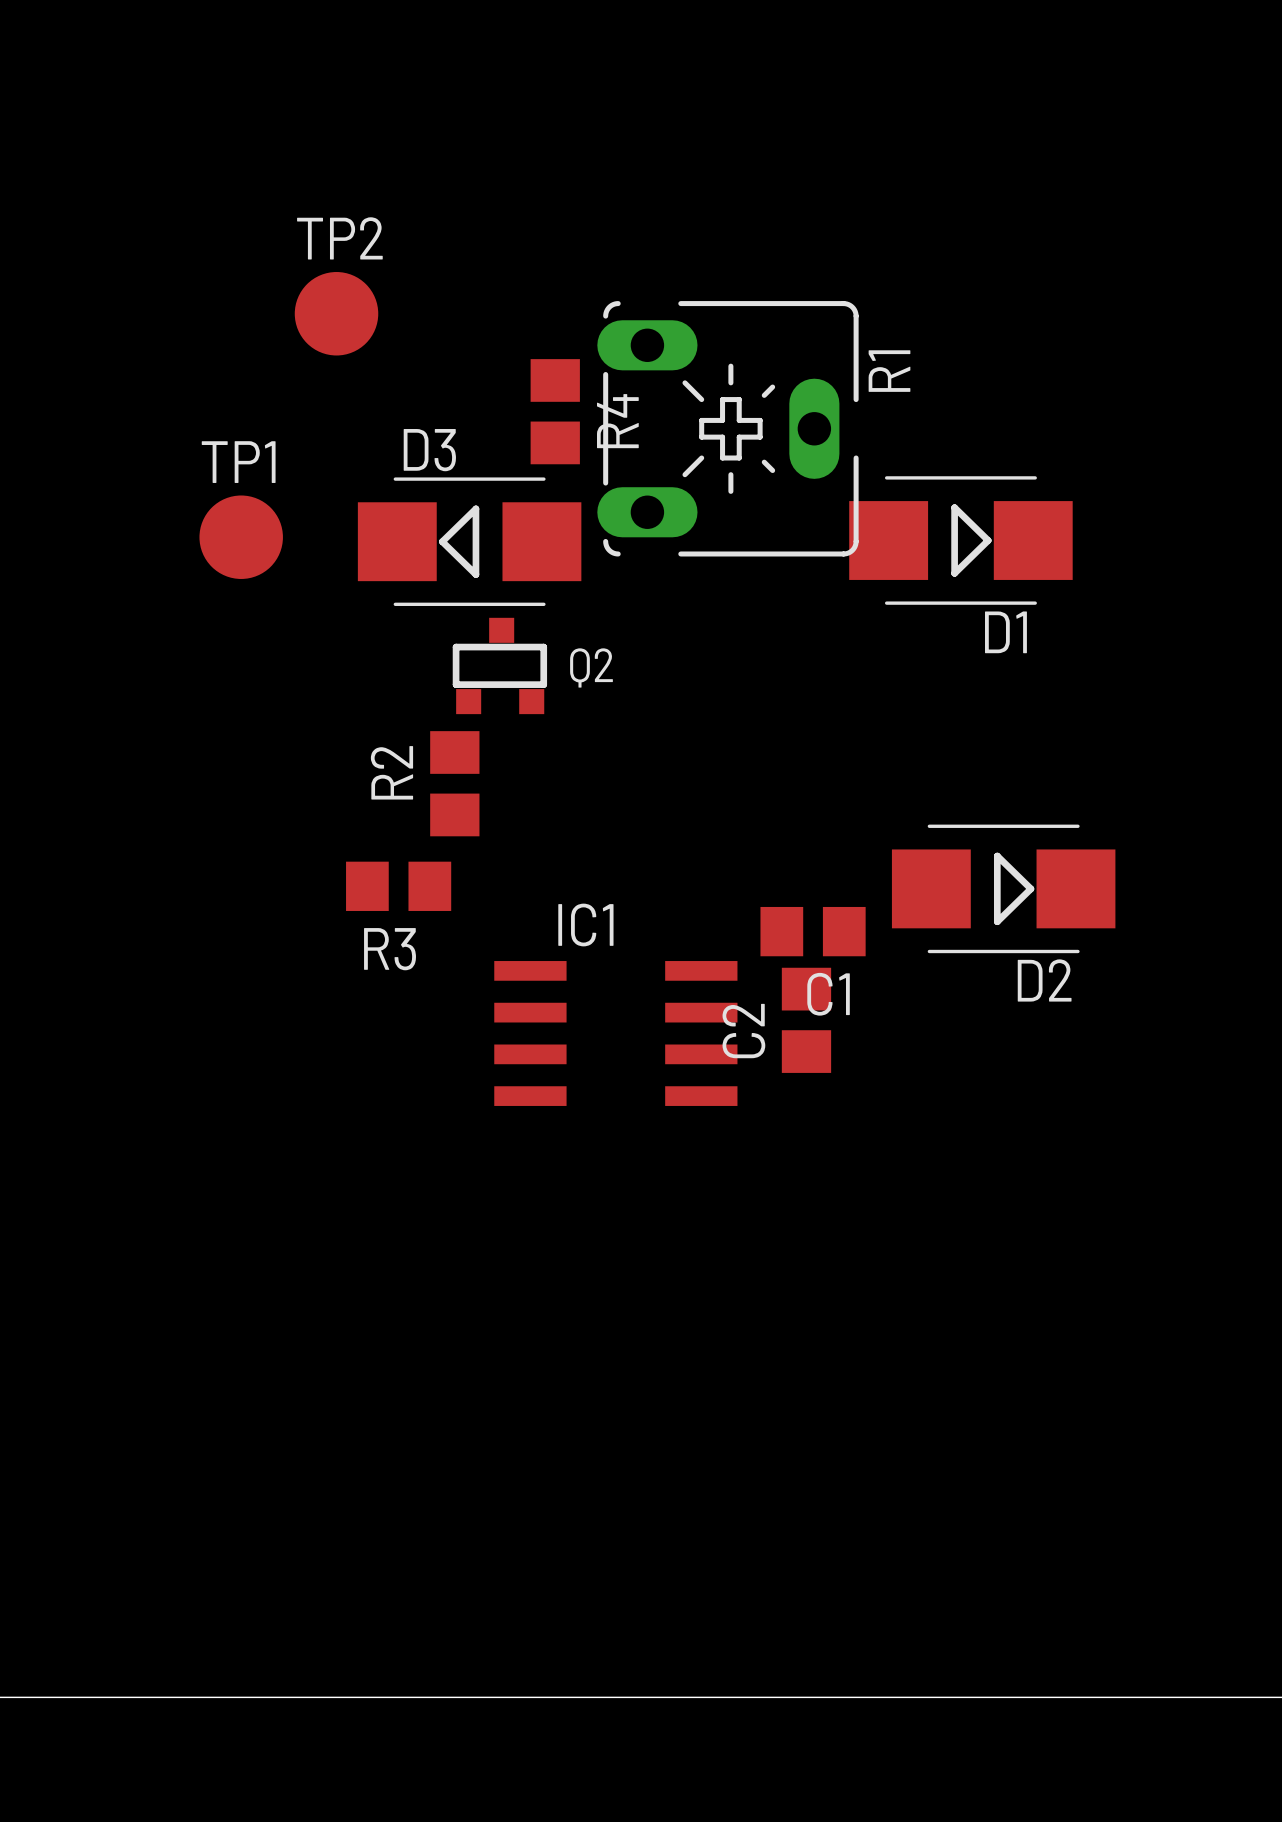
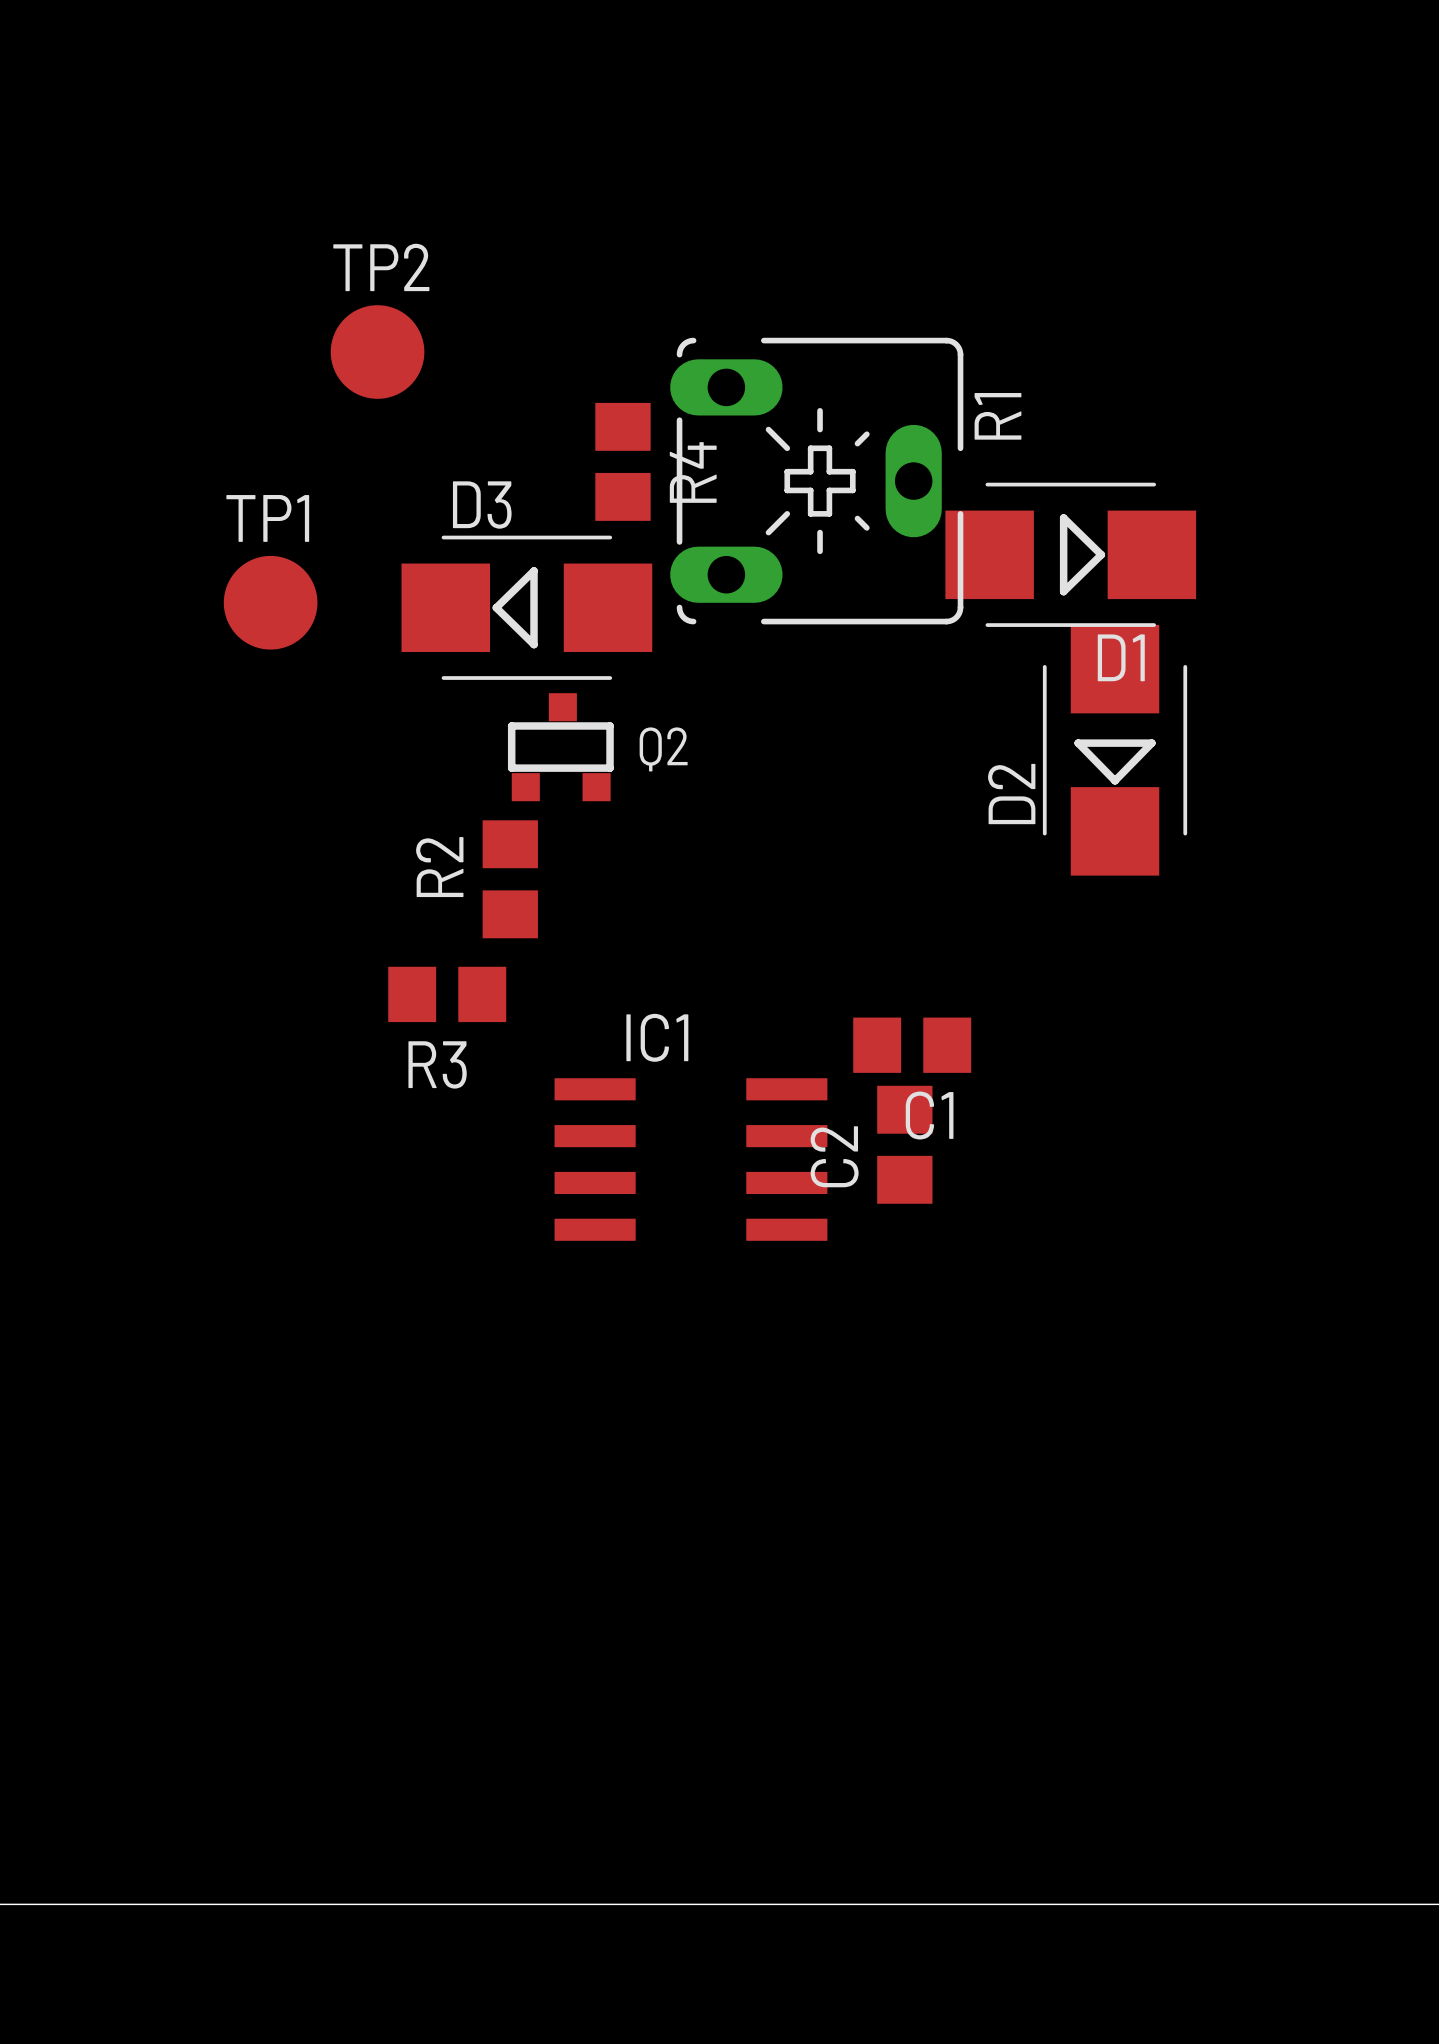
D1 position: (960, 540) -> (1070, 554)
D2 rotation: 0° (1003, 888) -> 90° clockwise (1115, 750)
D2 position: (1003, 888) -> (1115, 750)

